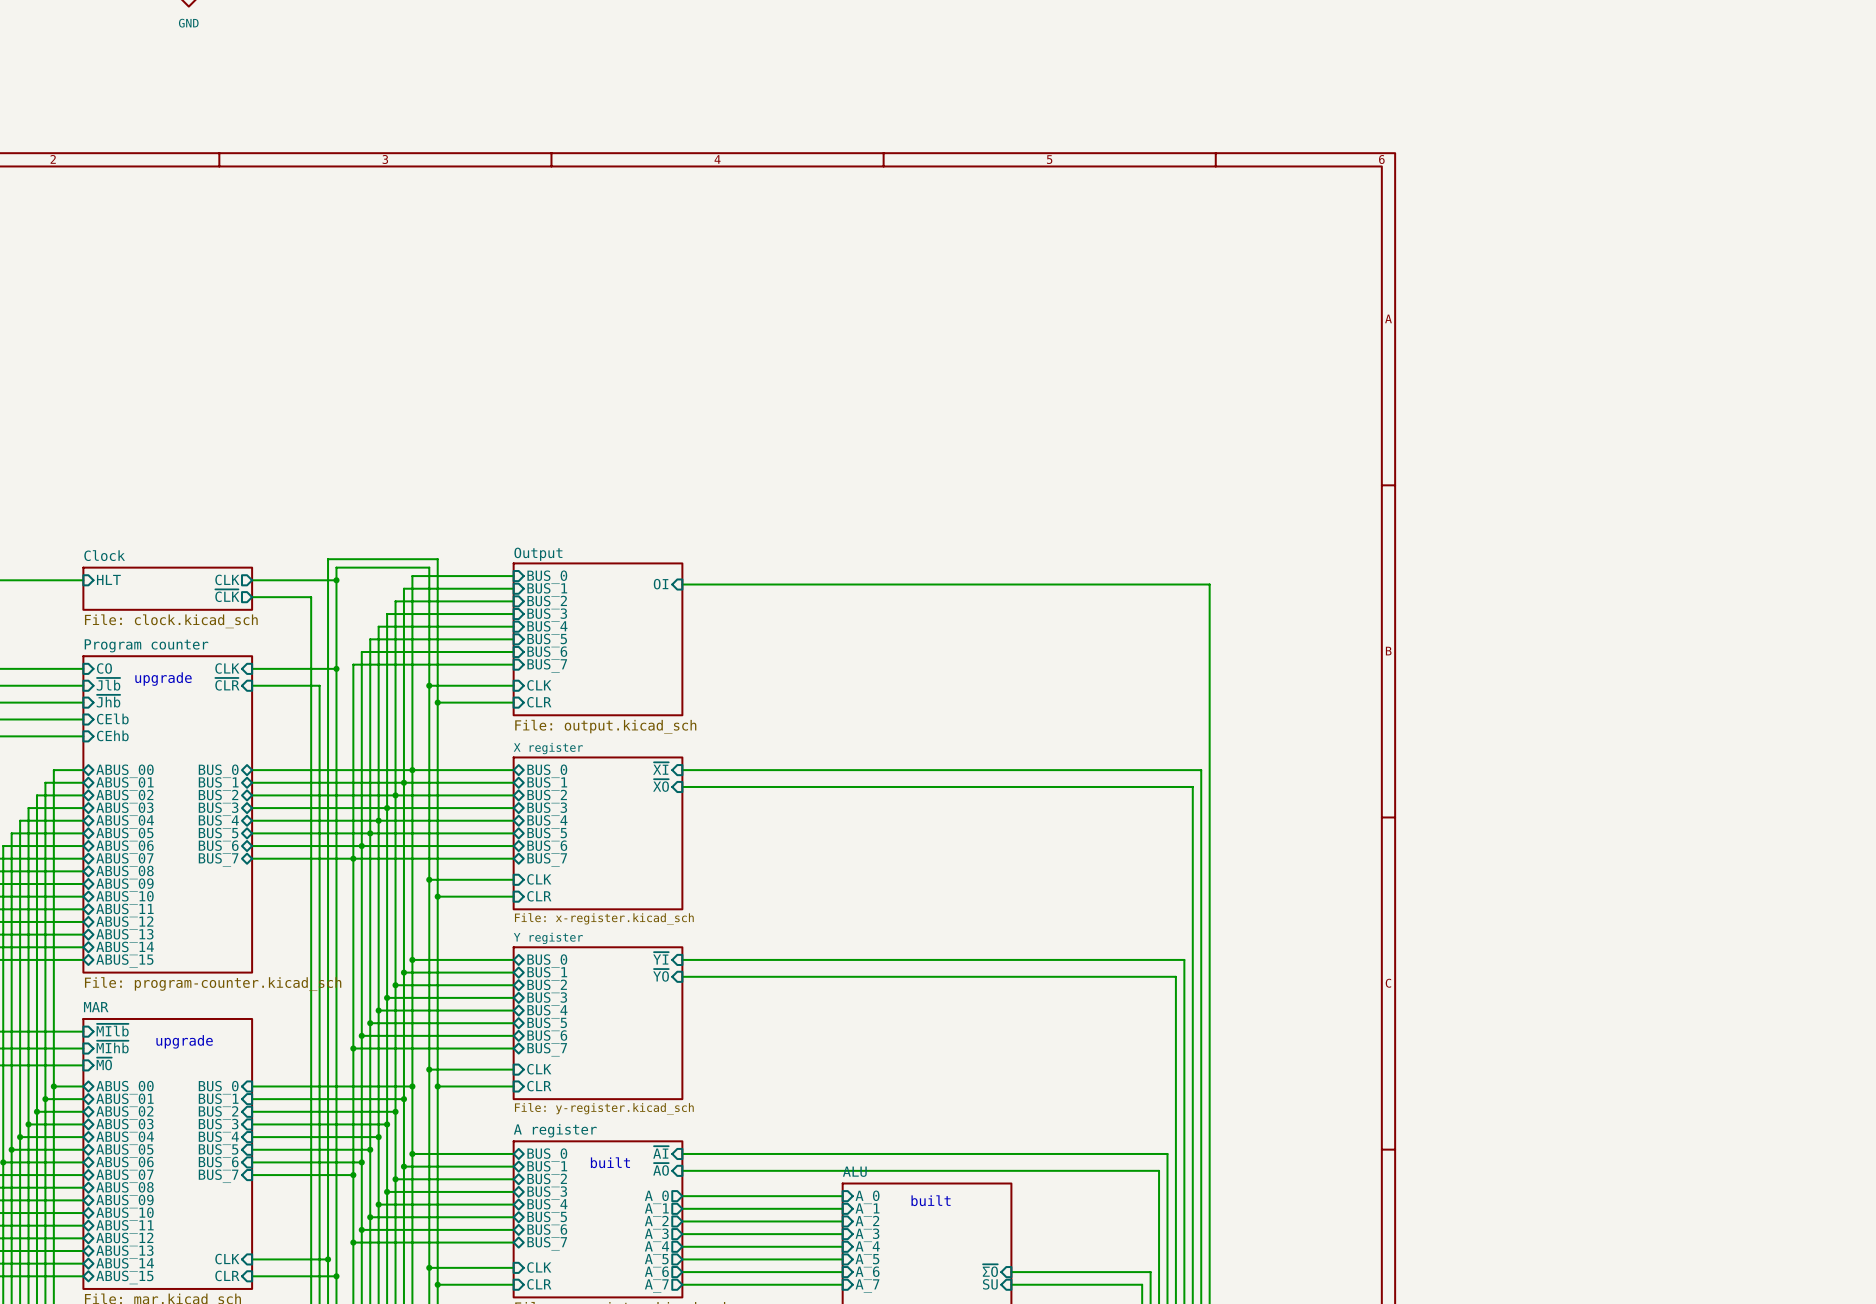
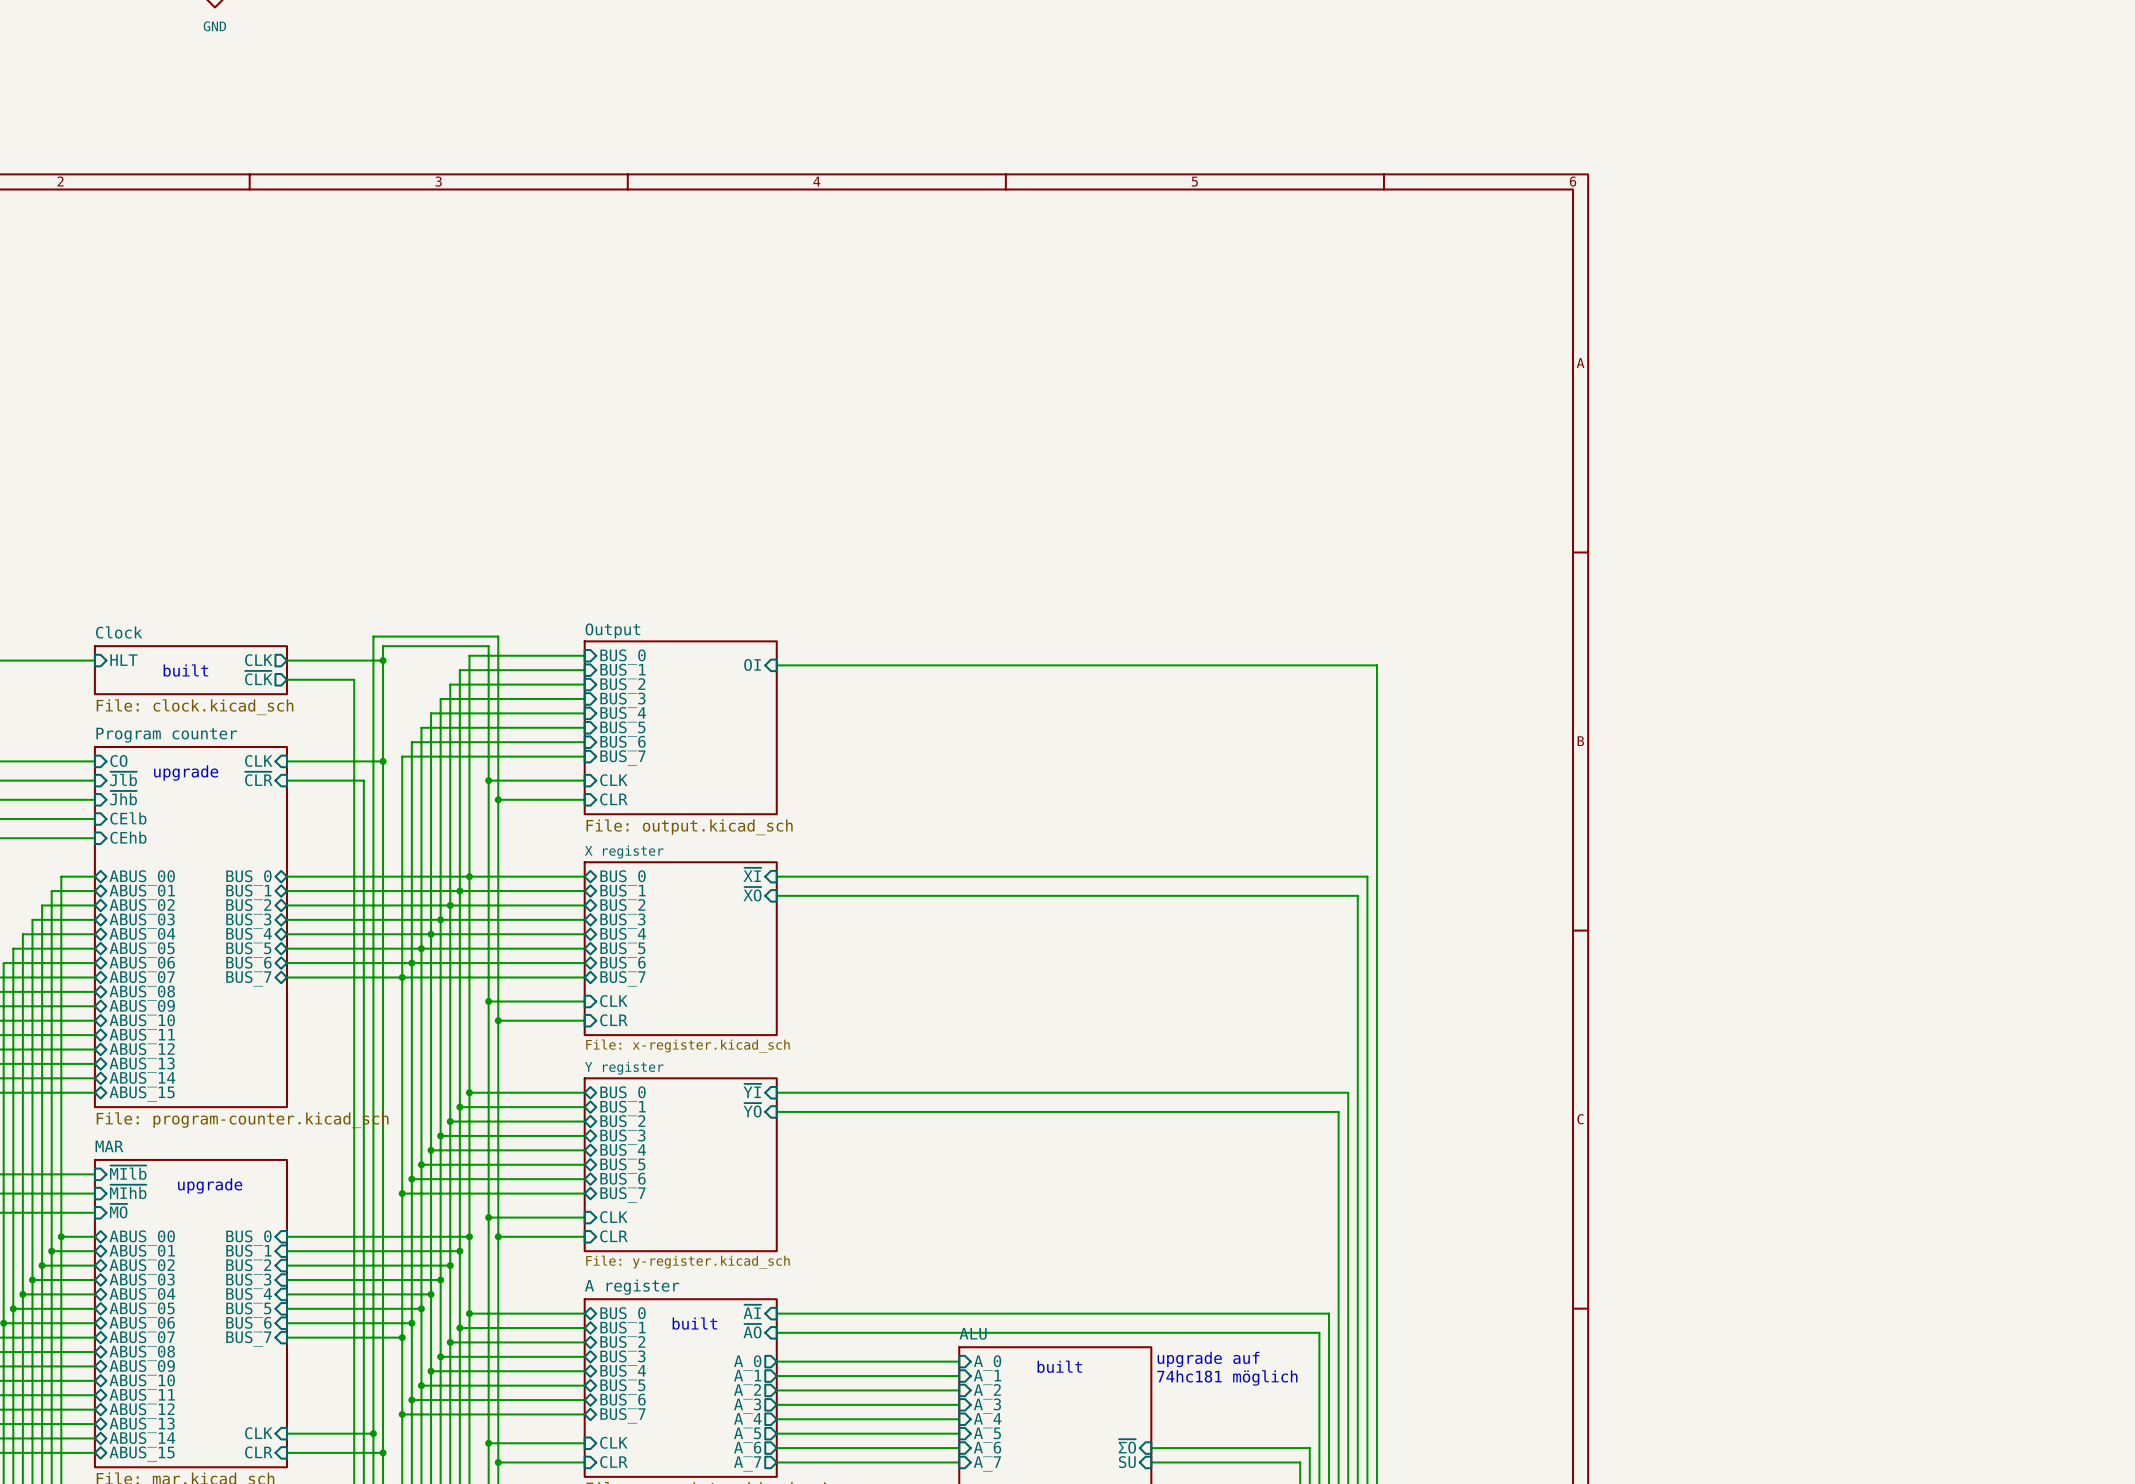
text: none -> built (185, 670)
text: none -> upgrade auf (1208, 1359)
text: none -> 74hc181 möglich (1227, 1377)

